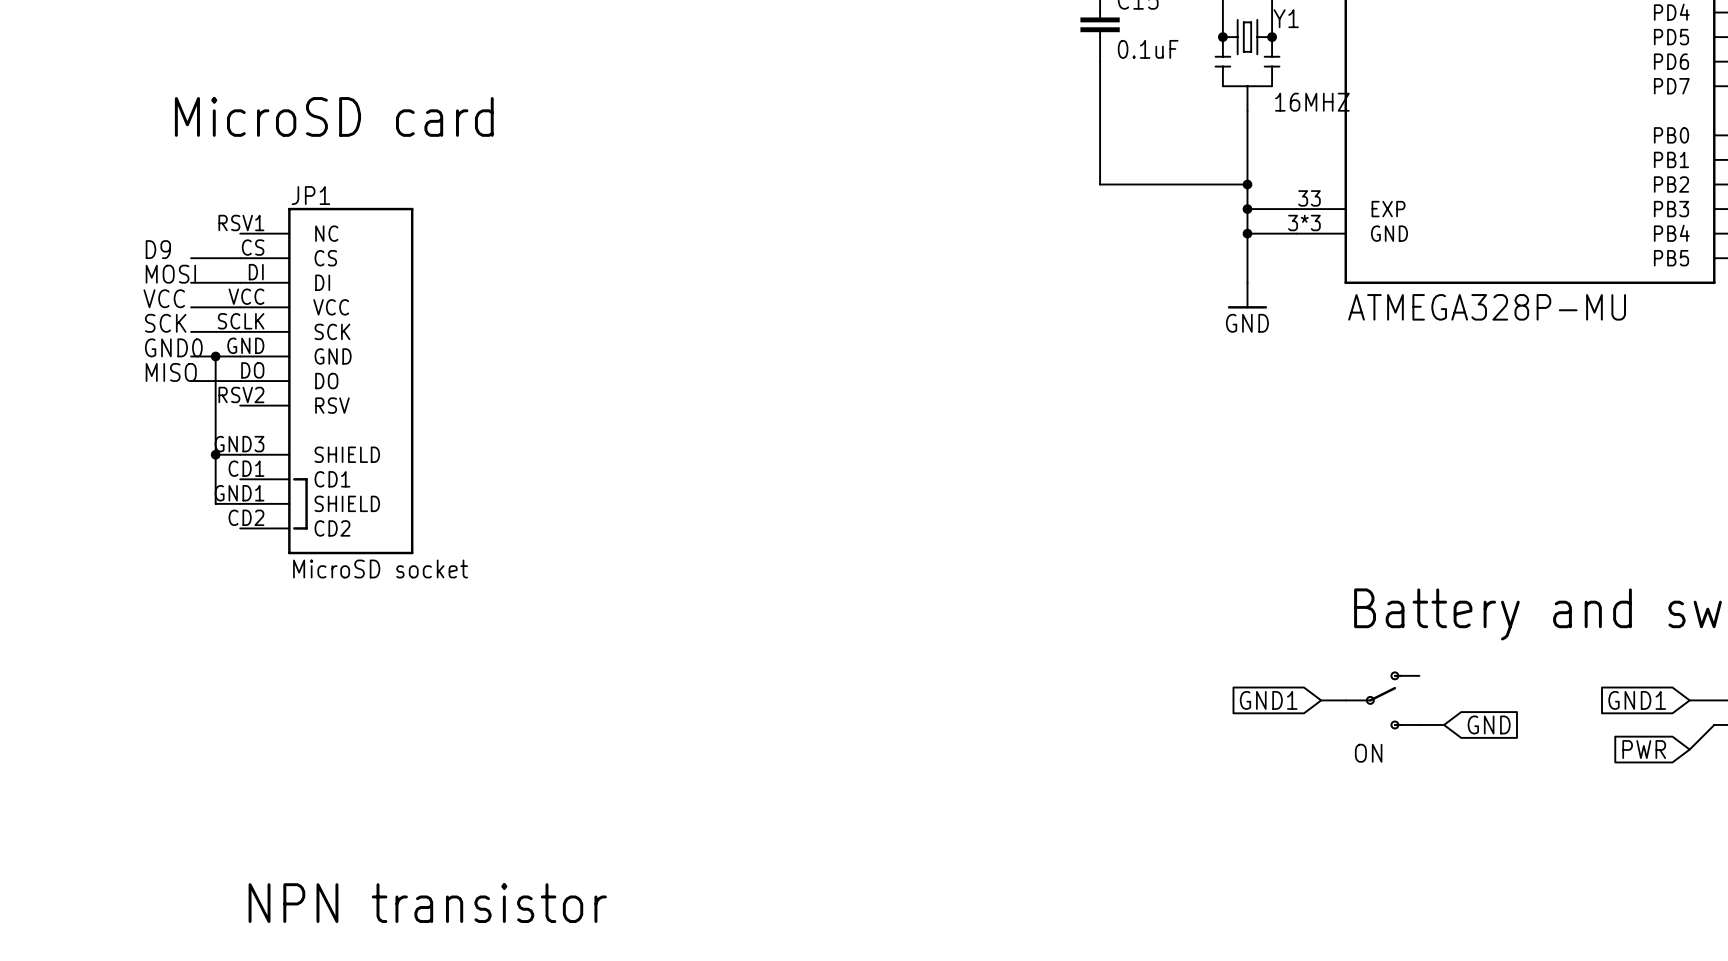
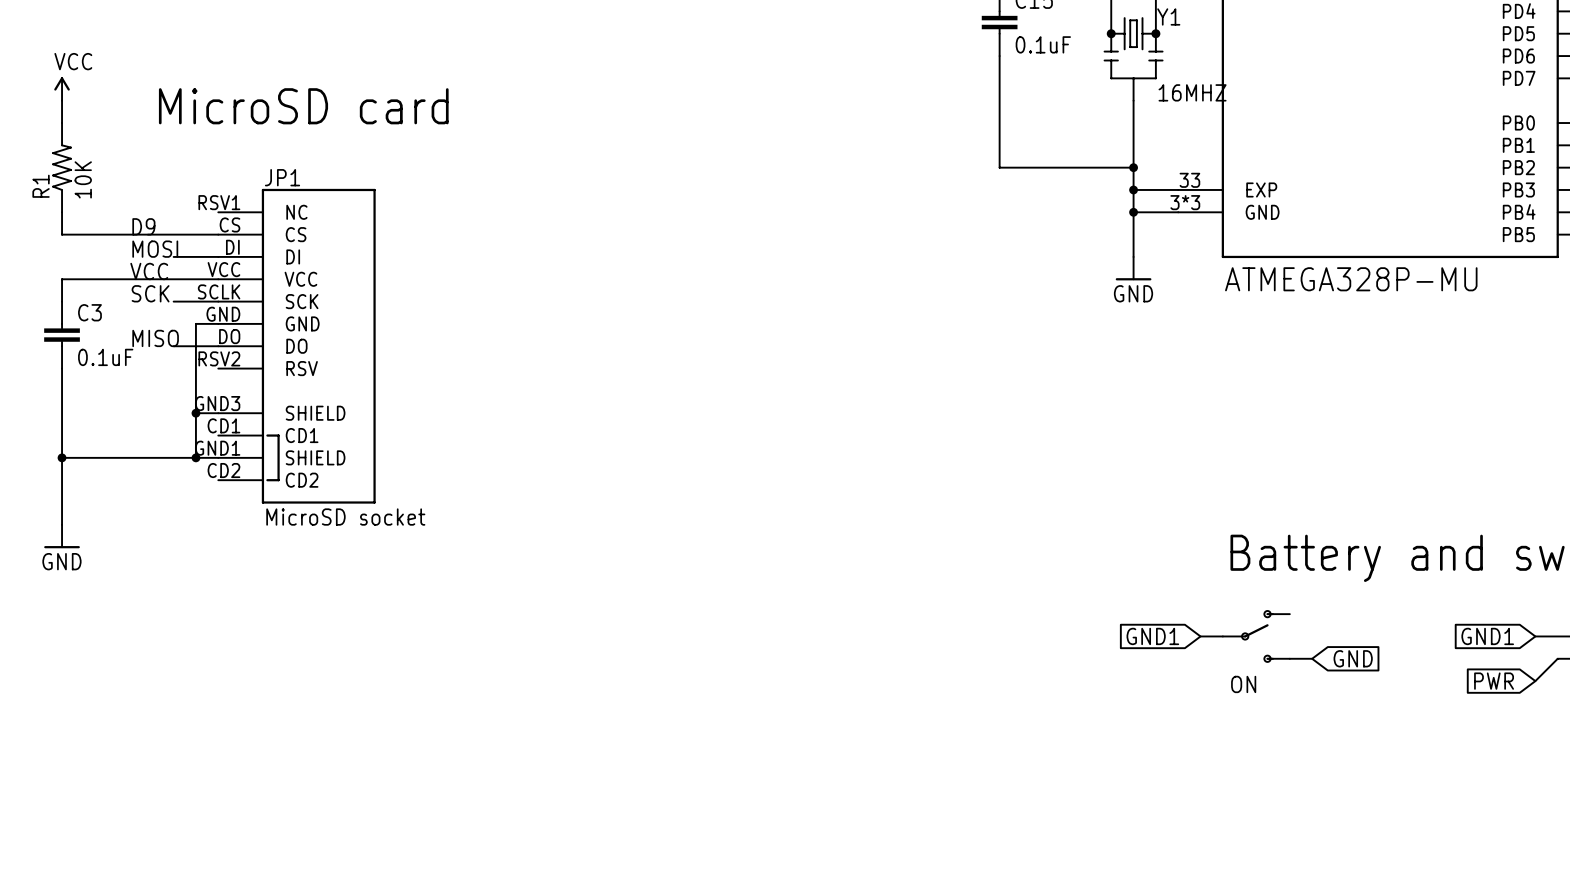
power symbol: none -> VCC (62, 88)
wire: none -> (62, 100) (62, 123)
R1: none -> 10K (62, 167)
wire: none -> (62, 212) (62, 234) (173, 234)
wire: none -> (173, 279) (62, 279) (62, 301)
label: GND0 (173, 347) -> none
wire: (191, 356) (215, 356) -> none
junction: (215, 356) -> none
C3: none -> 0.1uF (62, 335)
wire: none -> (62, 368) (62, 524)
wire: none -> (62, 457) (195, 457)
junction: none -> (62, 457)
junction: none -> (195, 457)
power symbol: none -> GND (62, 536)
text: NPN transistor (427, 903) -> none

